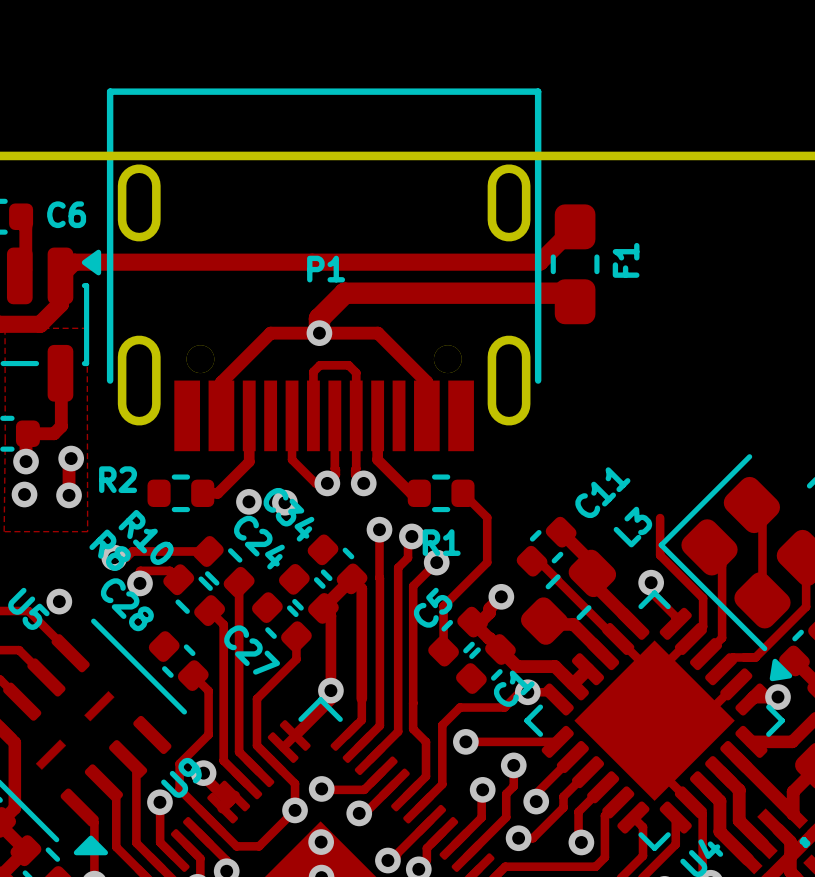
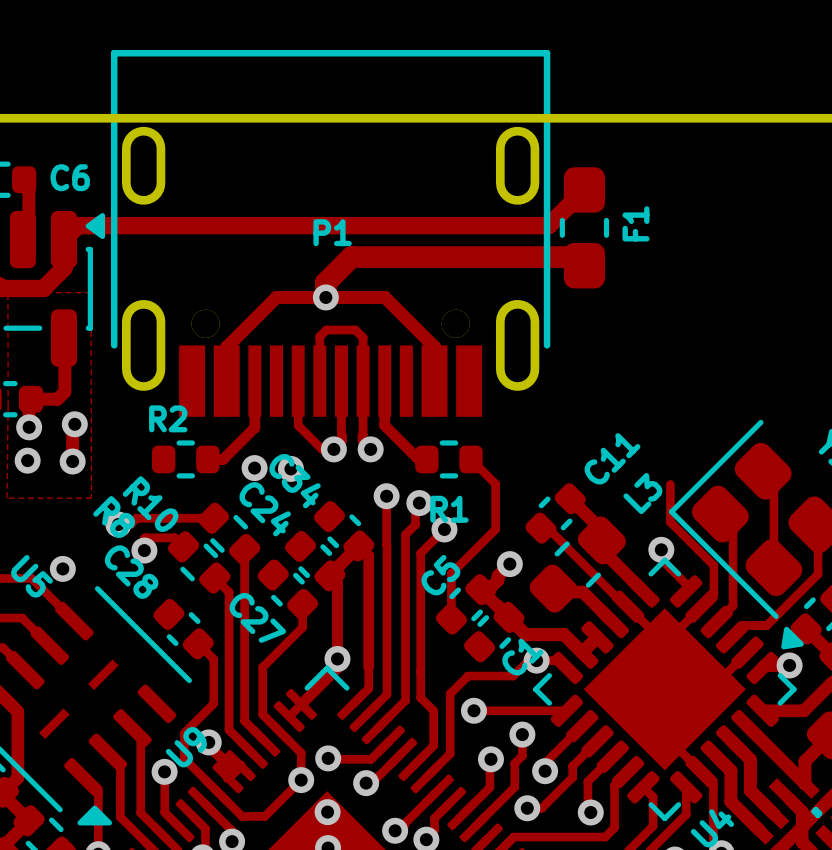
R2 name position: R2 (118, 479) -> R2 (168, 418)

